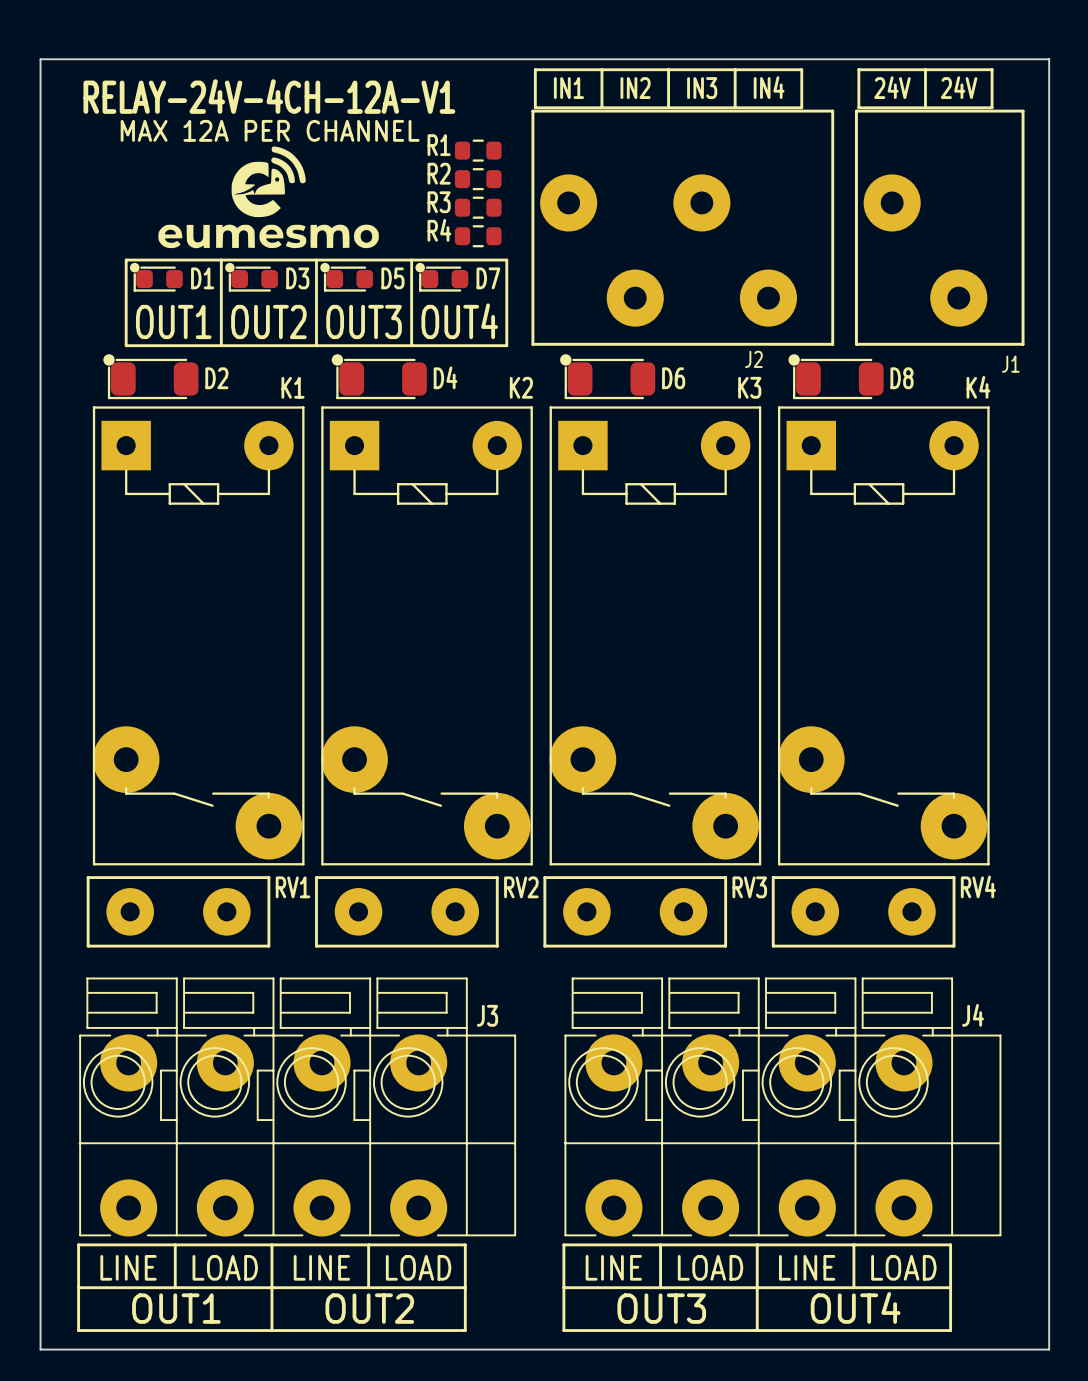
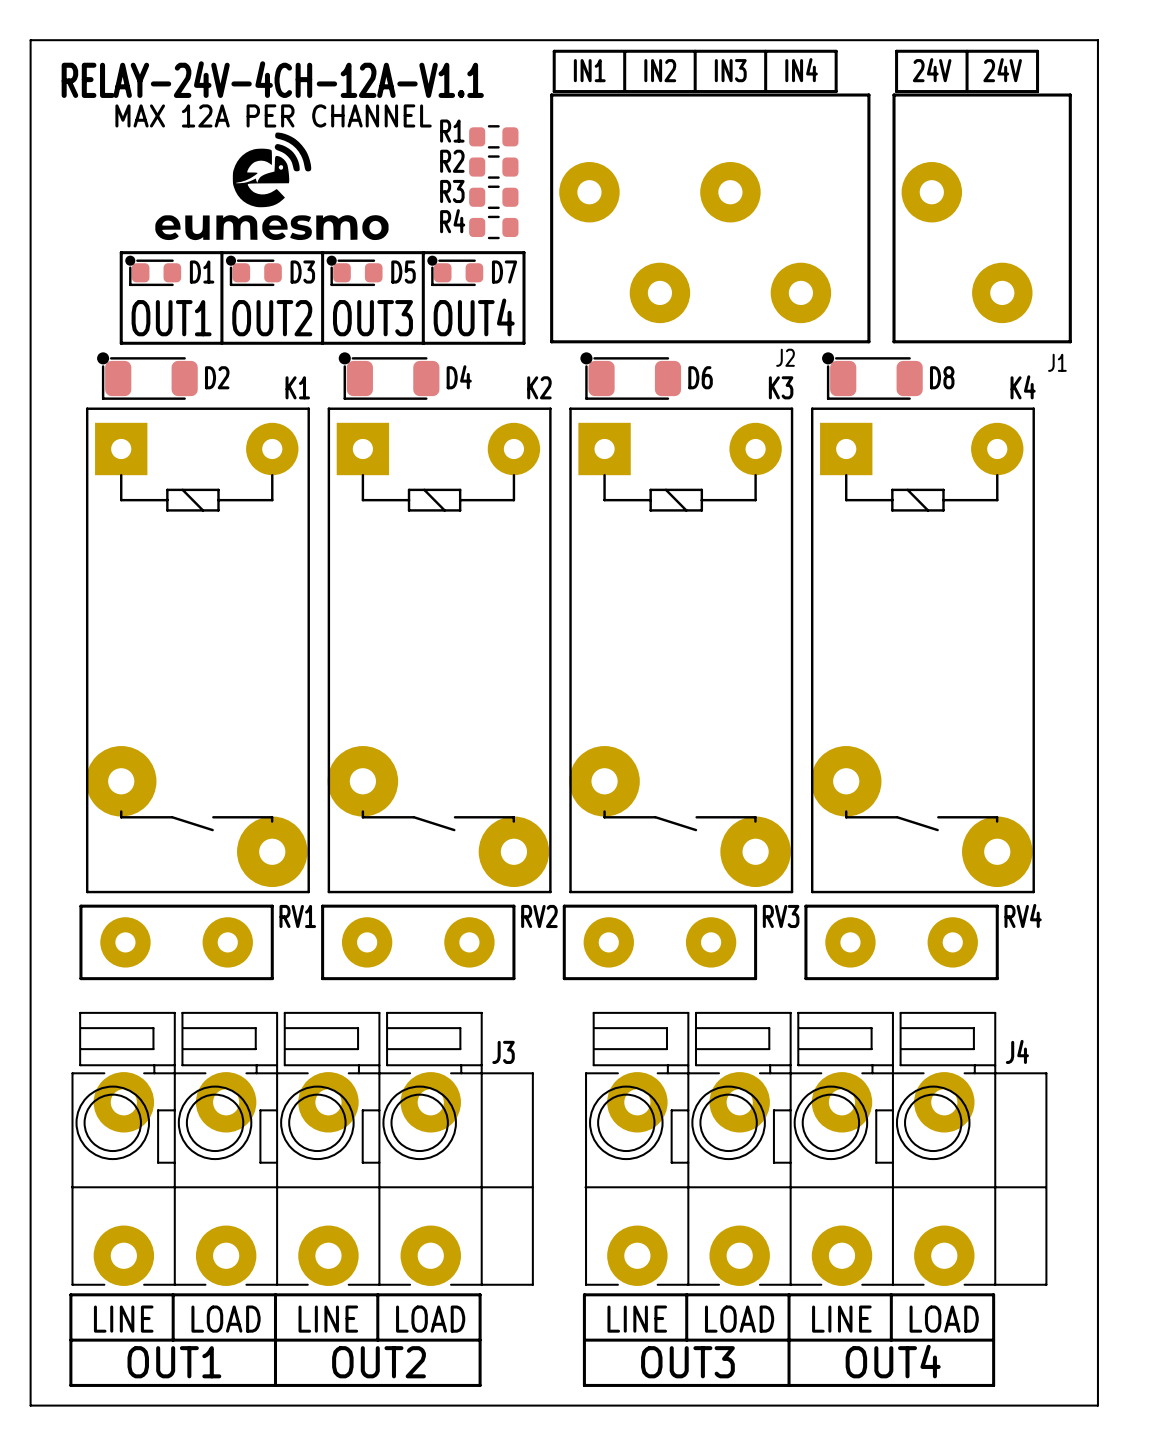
text: RELAY-24V-4CH-12A-V1 (269, 96) -> RELAY-24V-4CH-12A-V1.1 (272, 79)

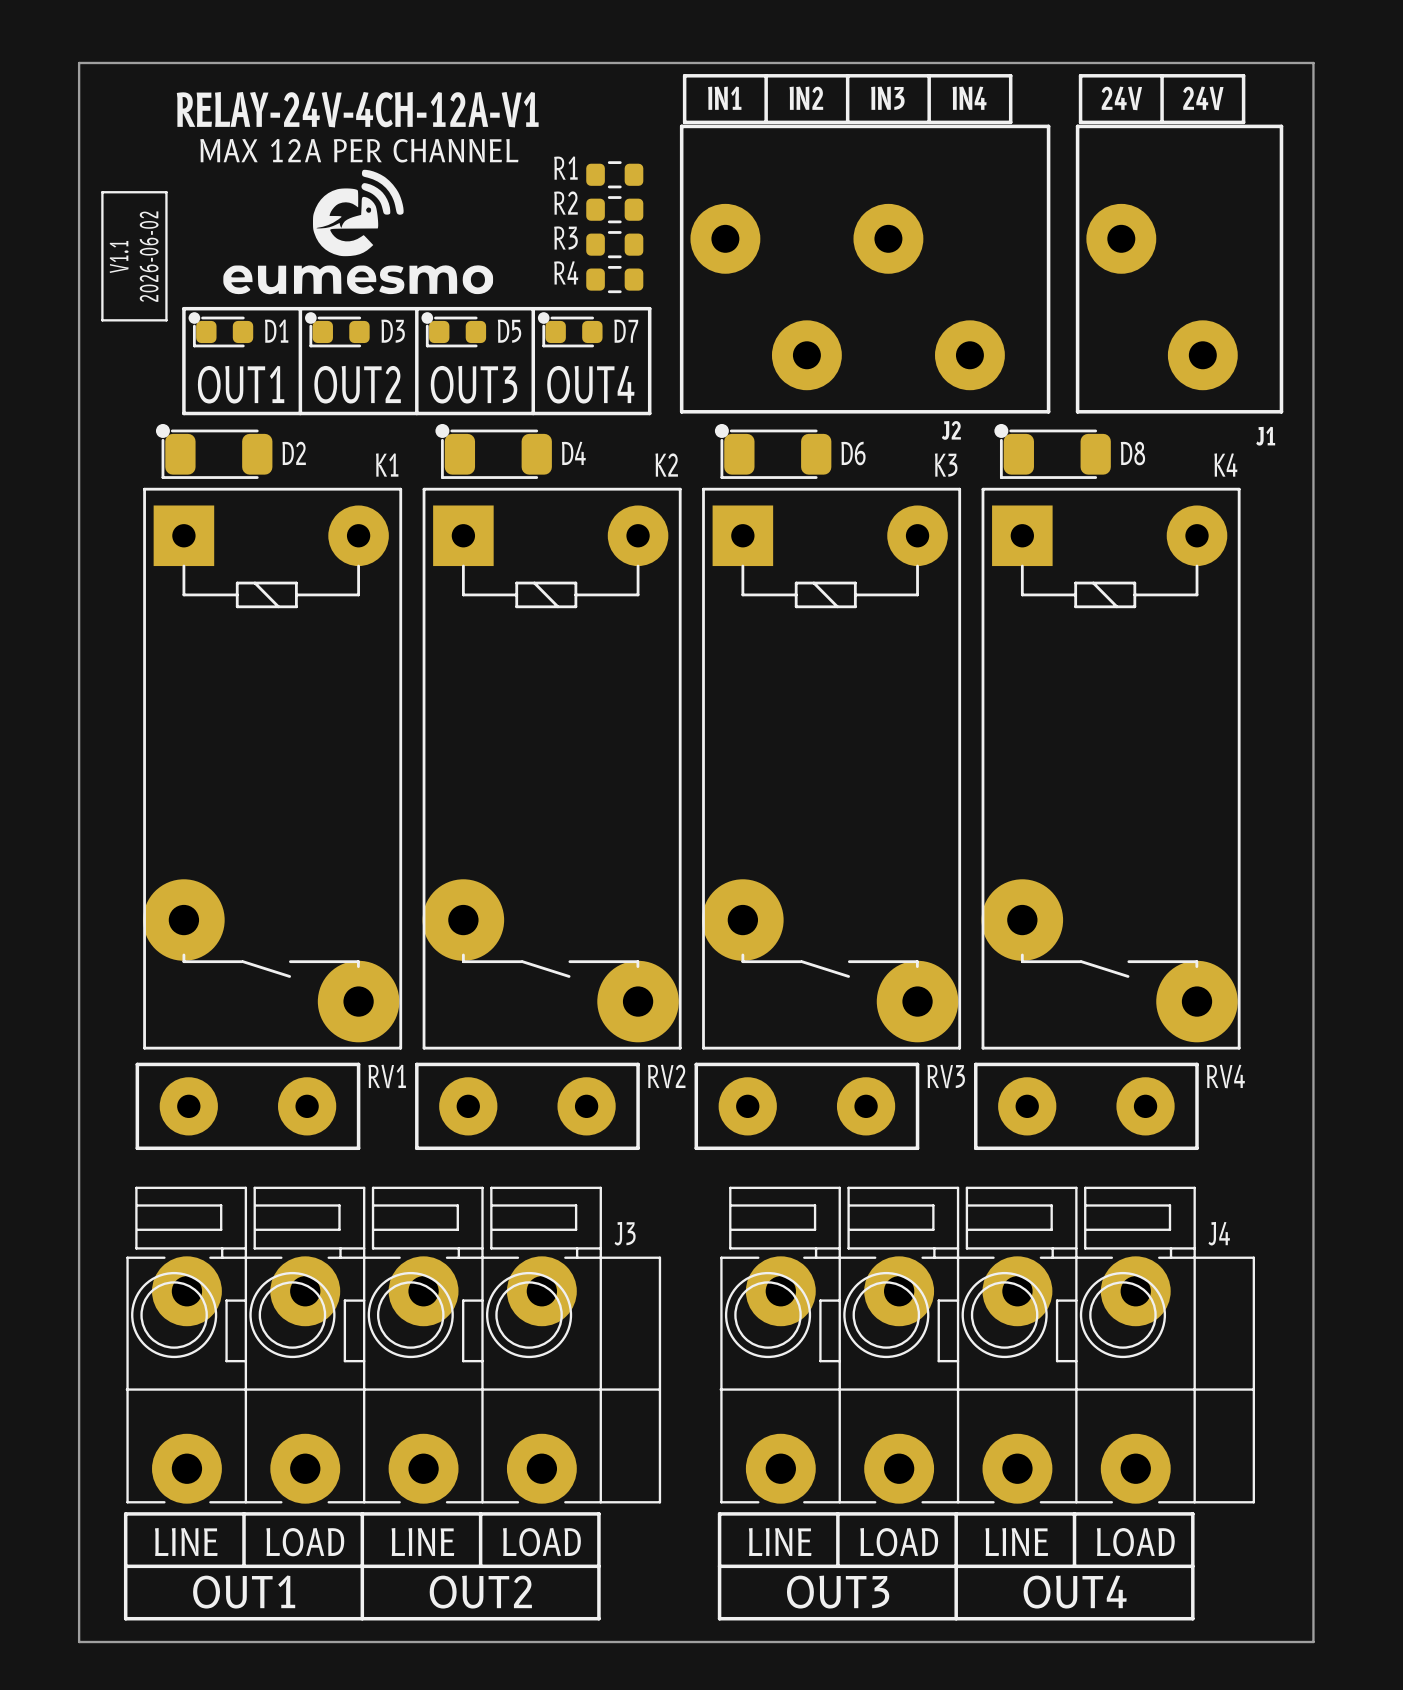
text: RELAY-24V-4CH-12A-V1.1 (272, 79) -> RELAY-24V-4CH-12A-V1 (357, 109)
line: none -> (102, 192) (166, 192) (166, 320) (102, 320) (102, 192)
text: none -> V1.1 (119, 256)
text: none -> 2026-06-02 (149, 256)

